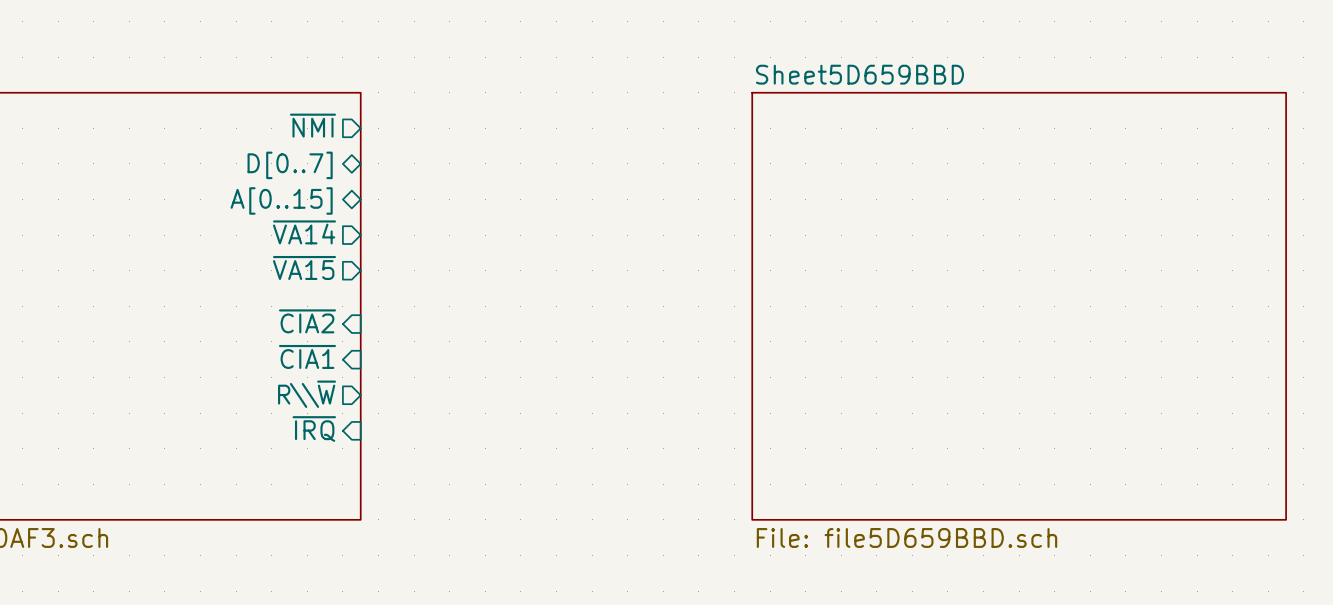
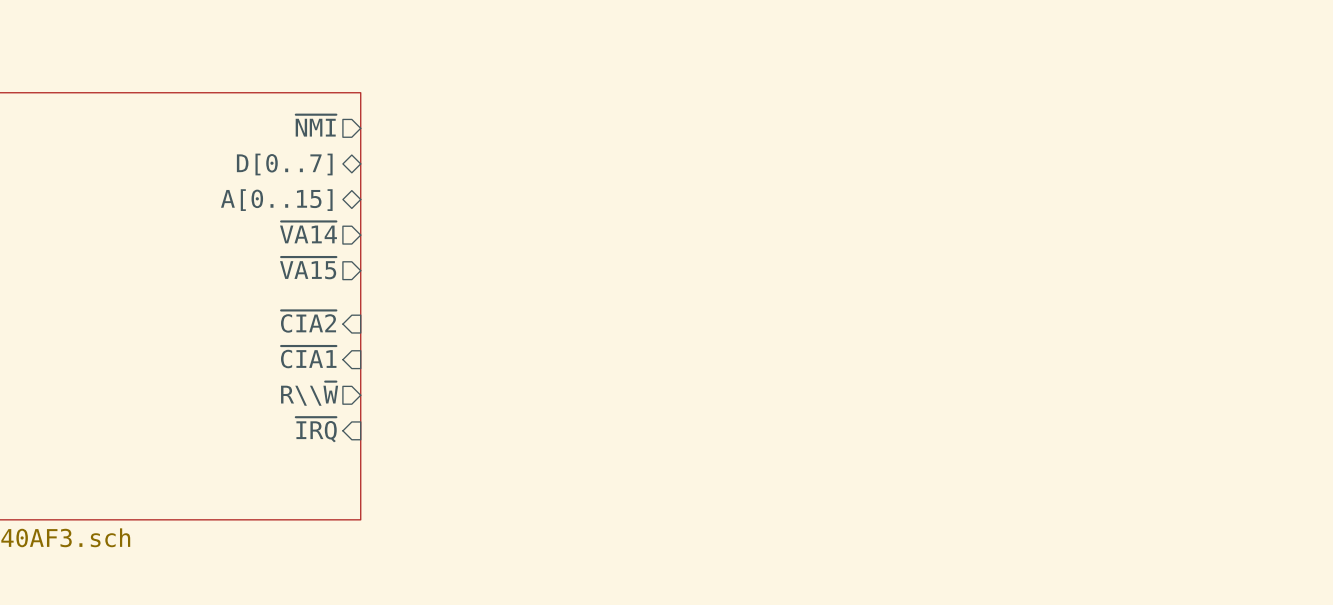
sheet Sheet5D659BBD: File: file5D659BBD.sch (1019, 306) -> none

